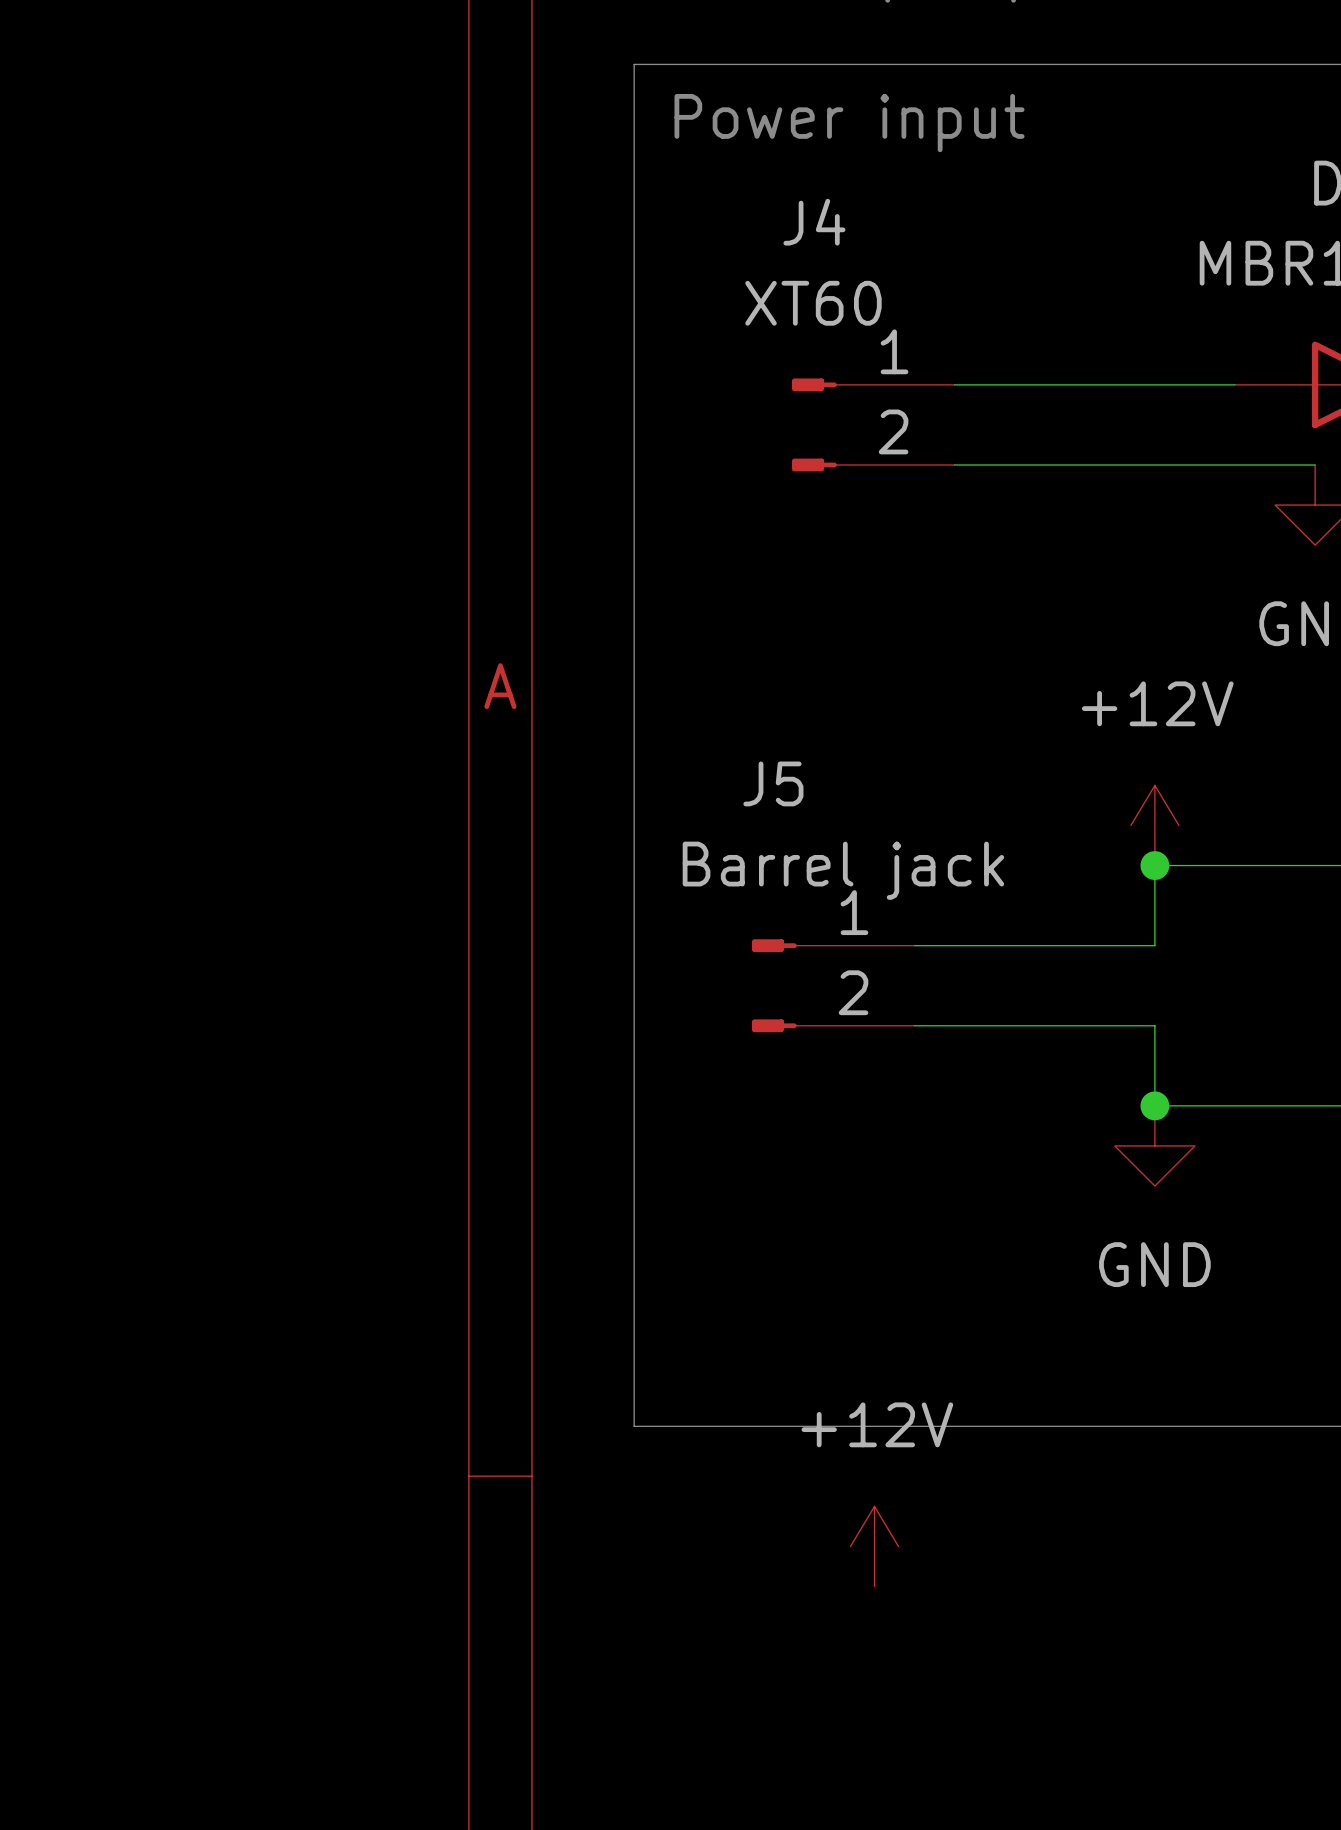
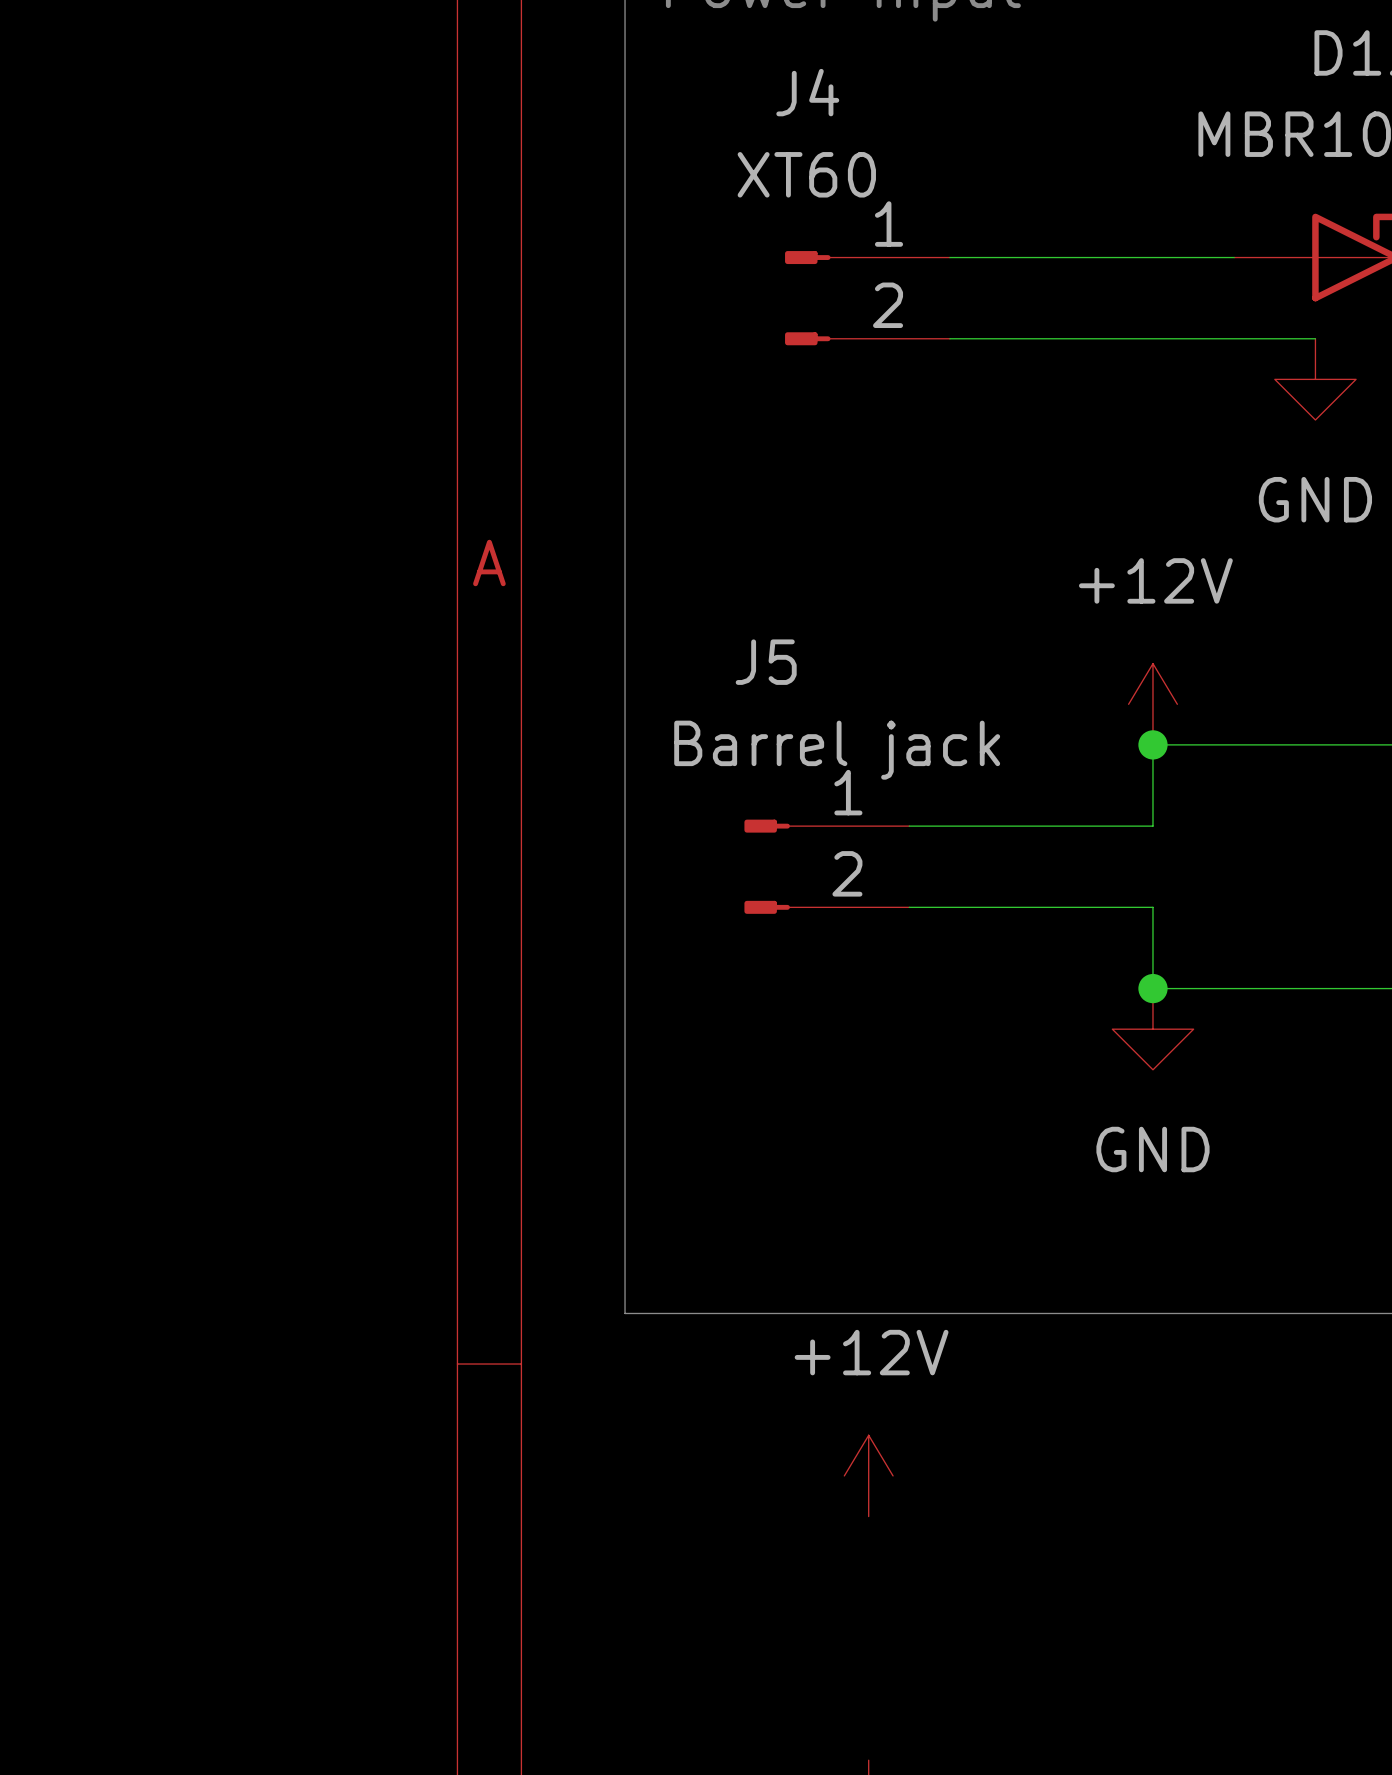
power symbol position: +12V (874, 1546) -> +12V (868, 1475)

